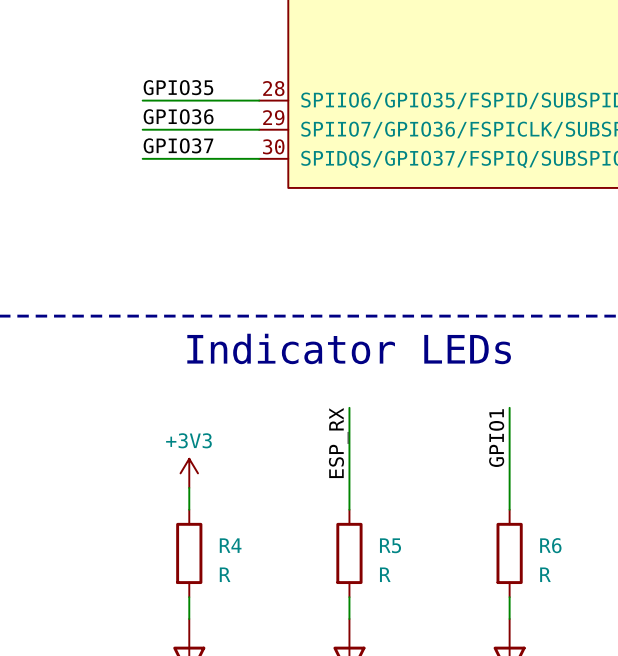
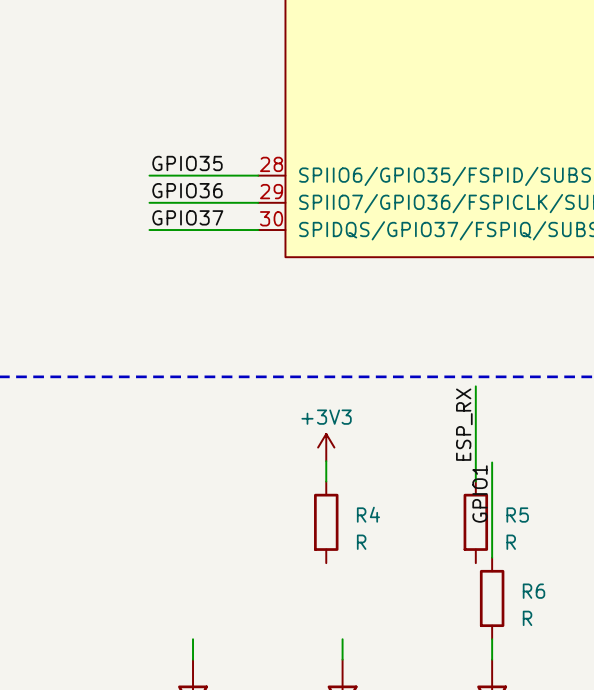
text: Indicator LEDs (349, 348) -> none
wire: (349, 407) (349, 509) -> (475, 386) (475, 481)
label position: ESP_RX (338, 443) -> ESP_RX (464, 424)
power symbol position: +3V3 (189, 473) -> +3V3 (326, 447)
wire: (189, 487) (189, 509) -> (326, 461) (326, 481)
R4 position: (189, 553) -> (326, 522)
R5 position: (349, 553) -> (475, 522)

